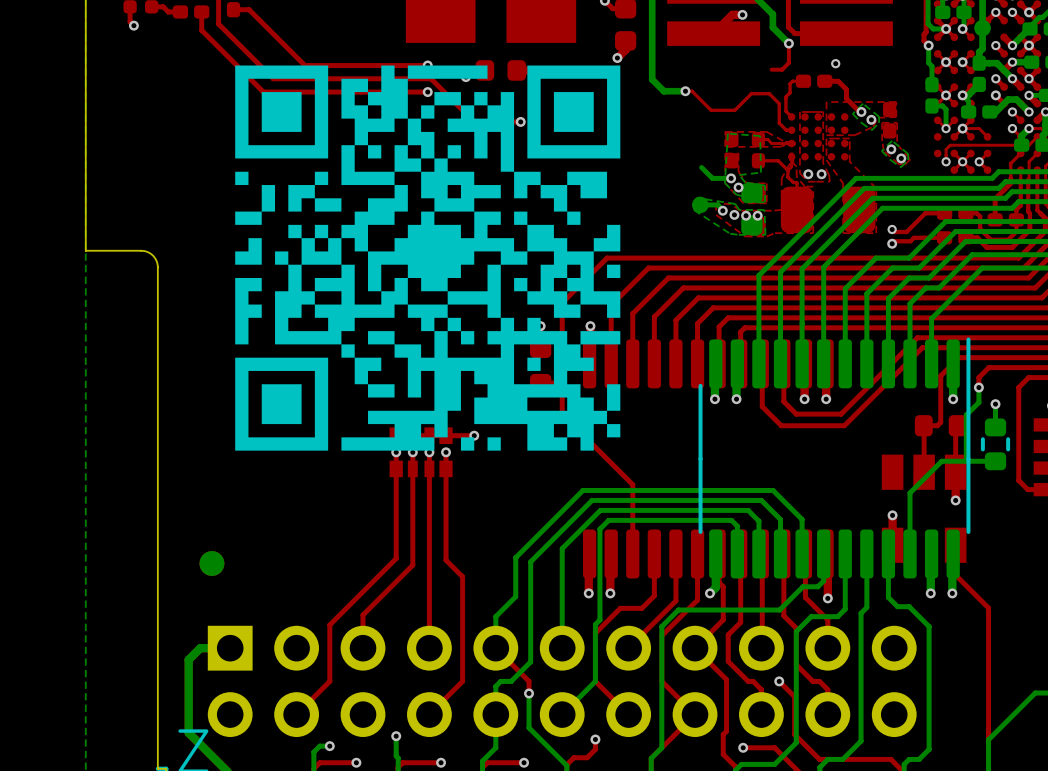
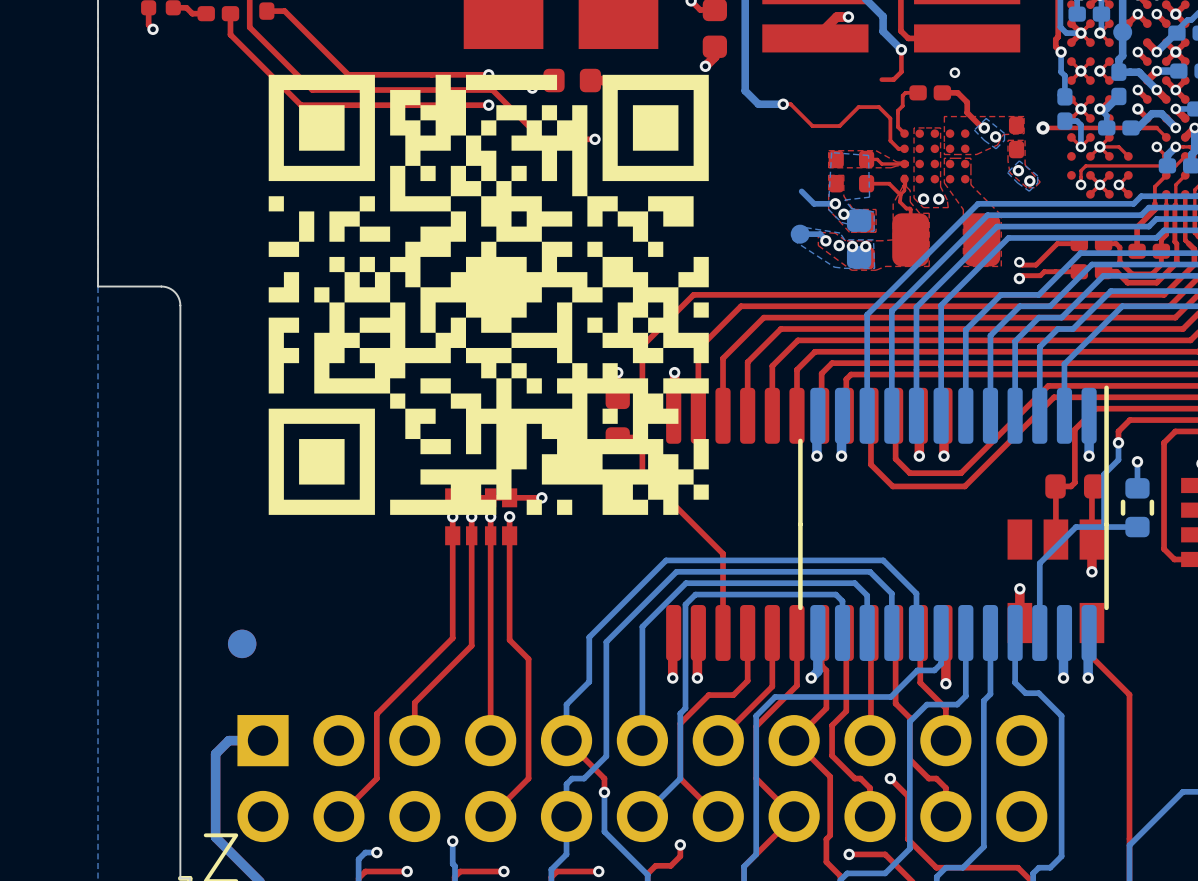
via: none -> (1043, 127)
top track: none -> (1156, 127) (1043, 127)
via: (1012, 111) -> none

